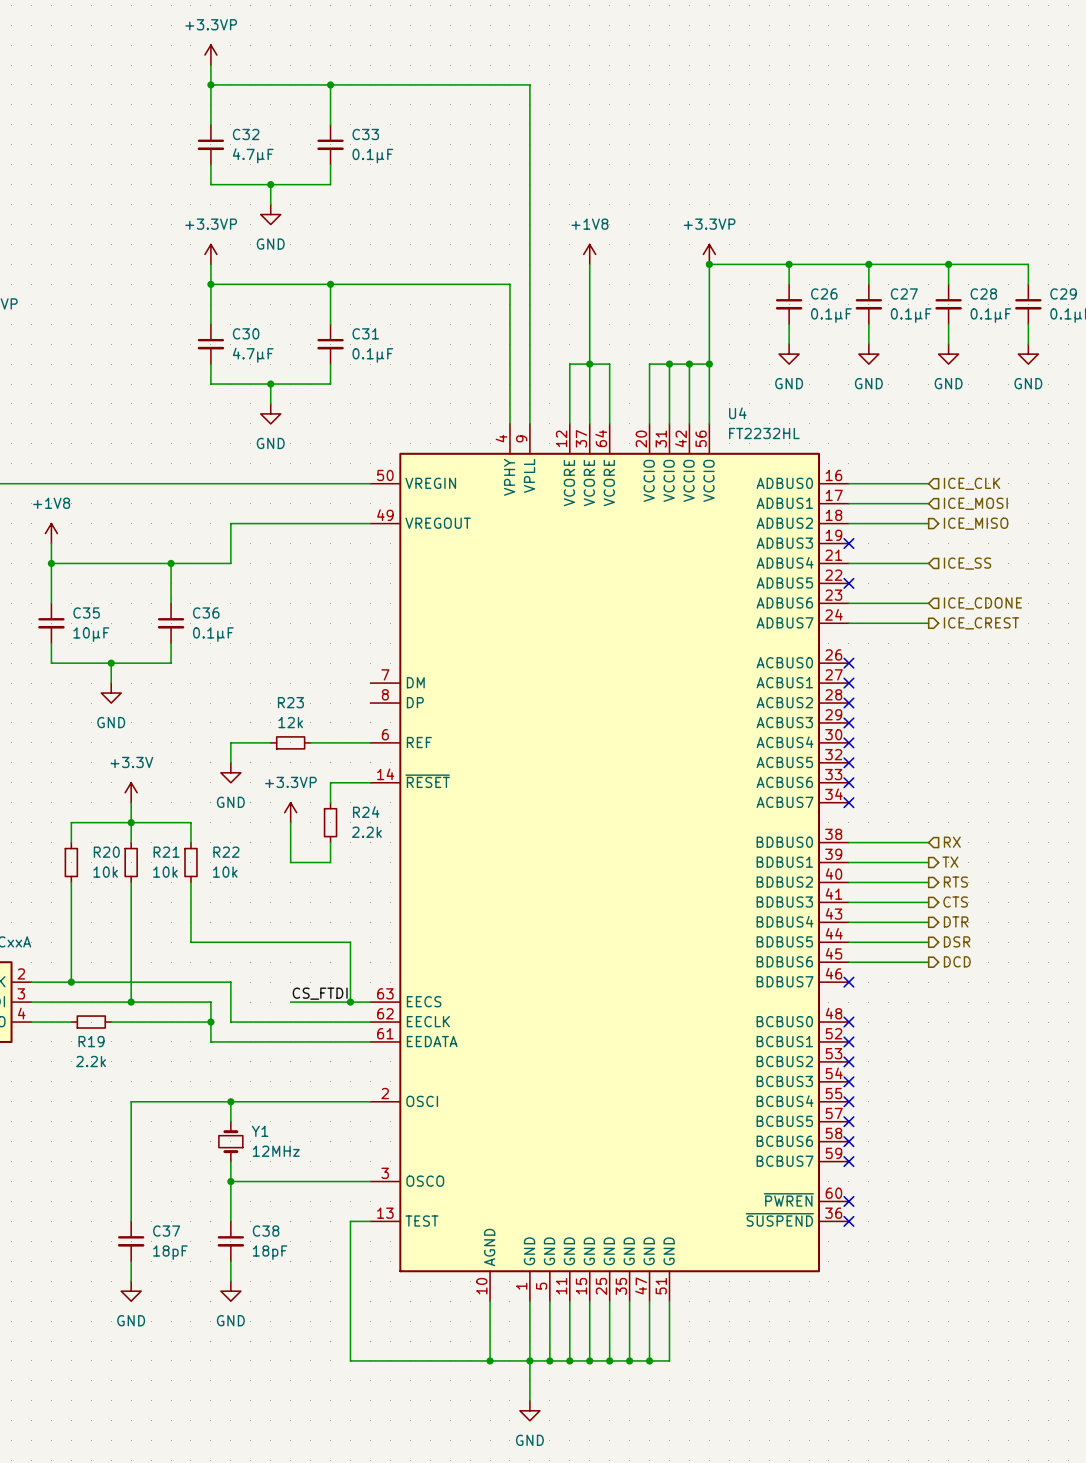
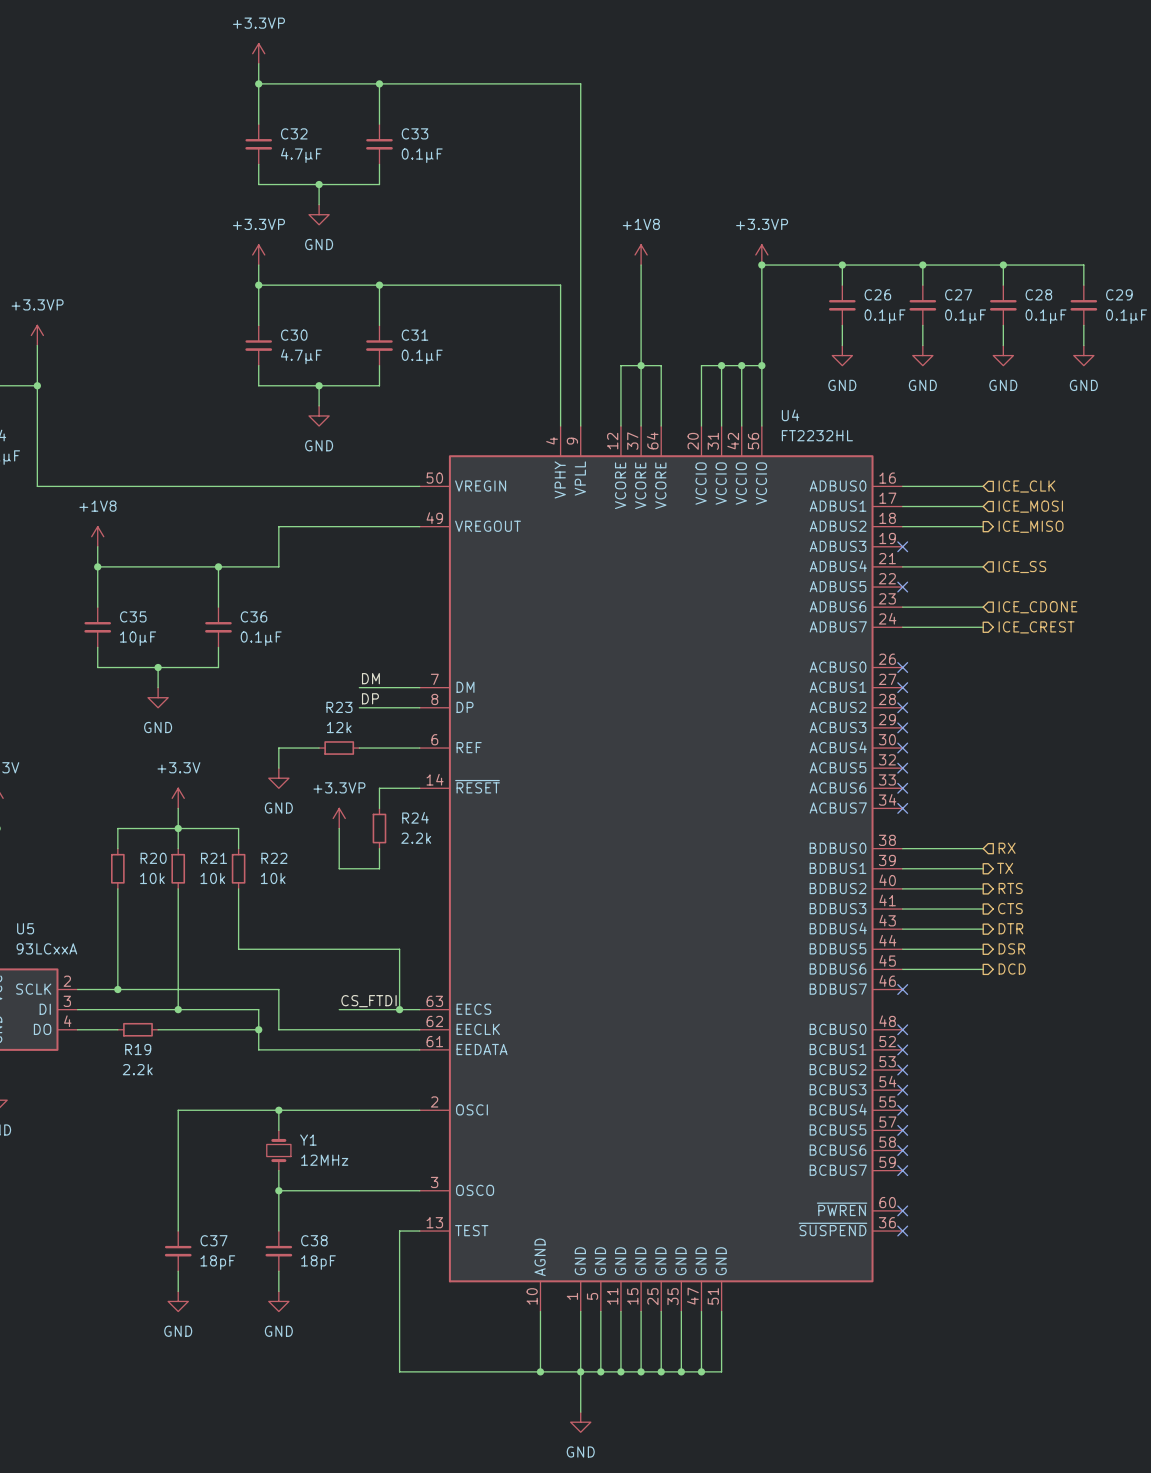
label: none -> DM (370, 678)
wire: none -> (359, 687) (419, 687)
label: none -> DP (370, 698)
wire: none -> (359, 707) (419, 707)

